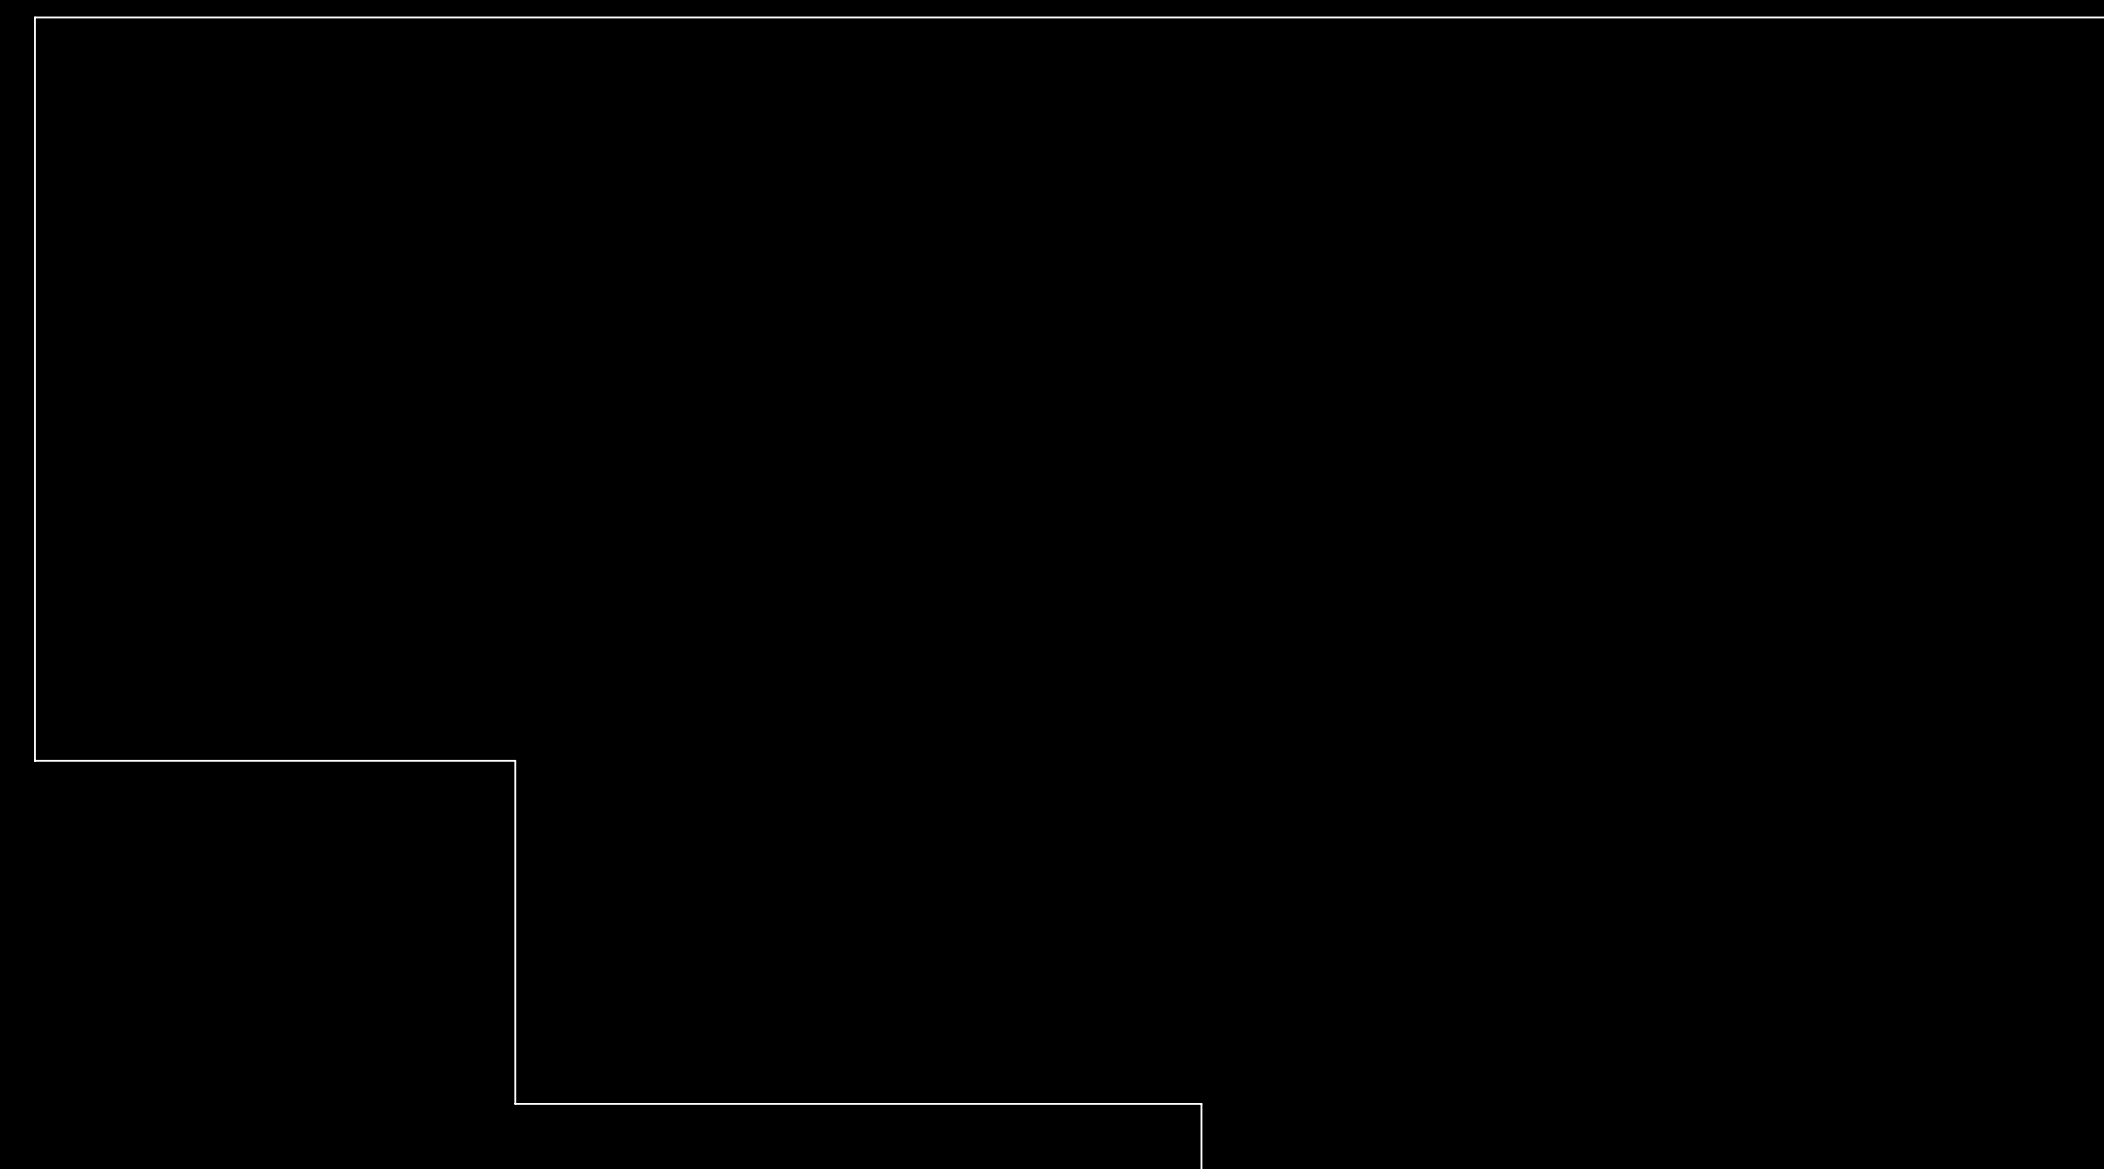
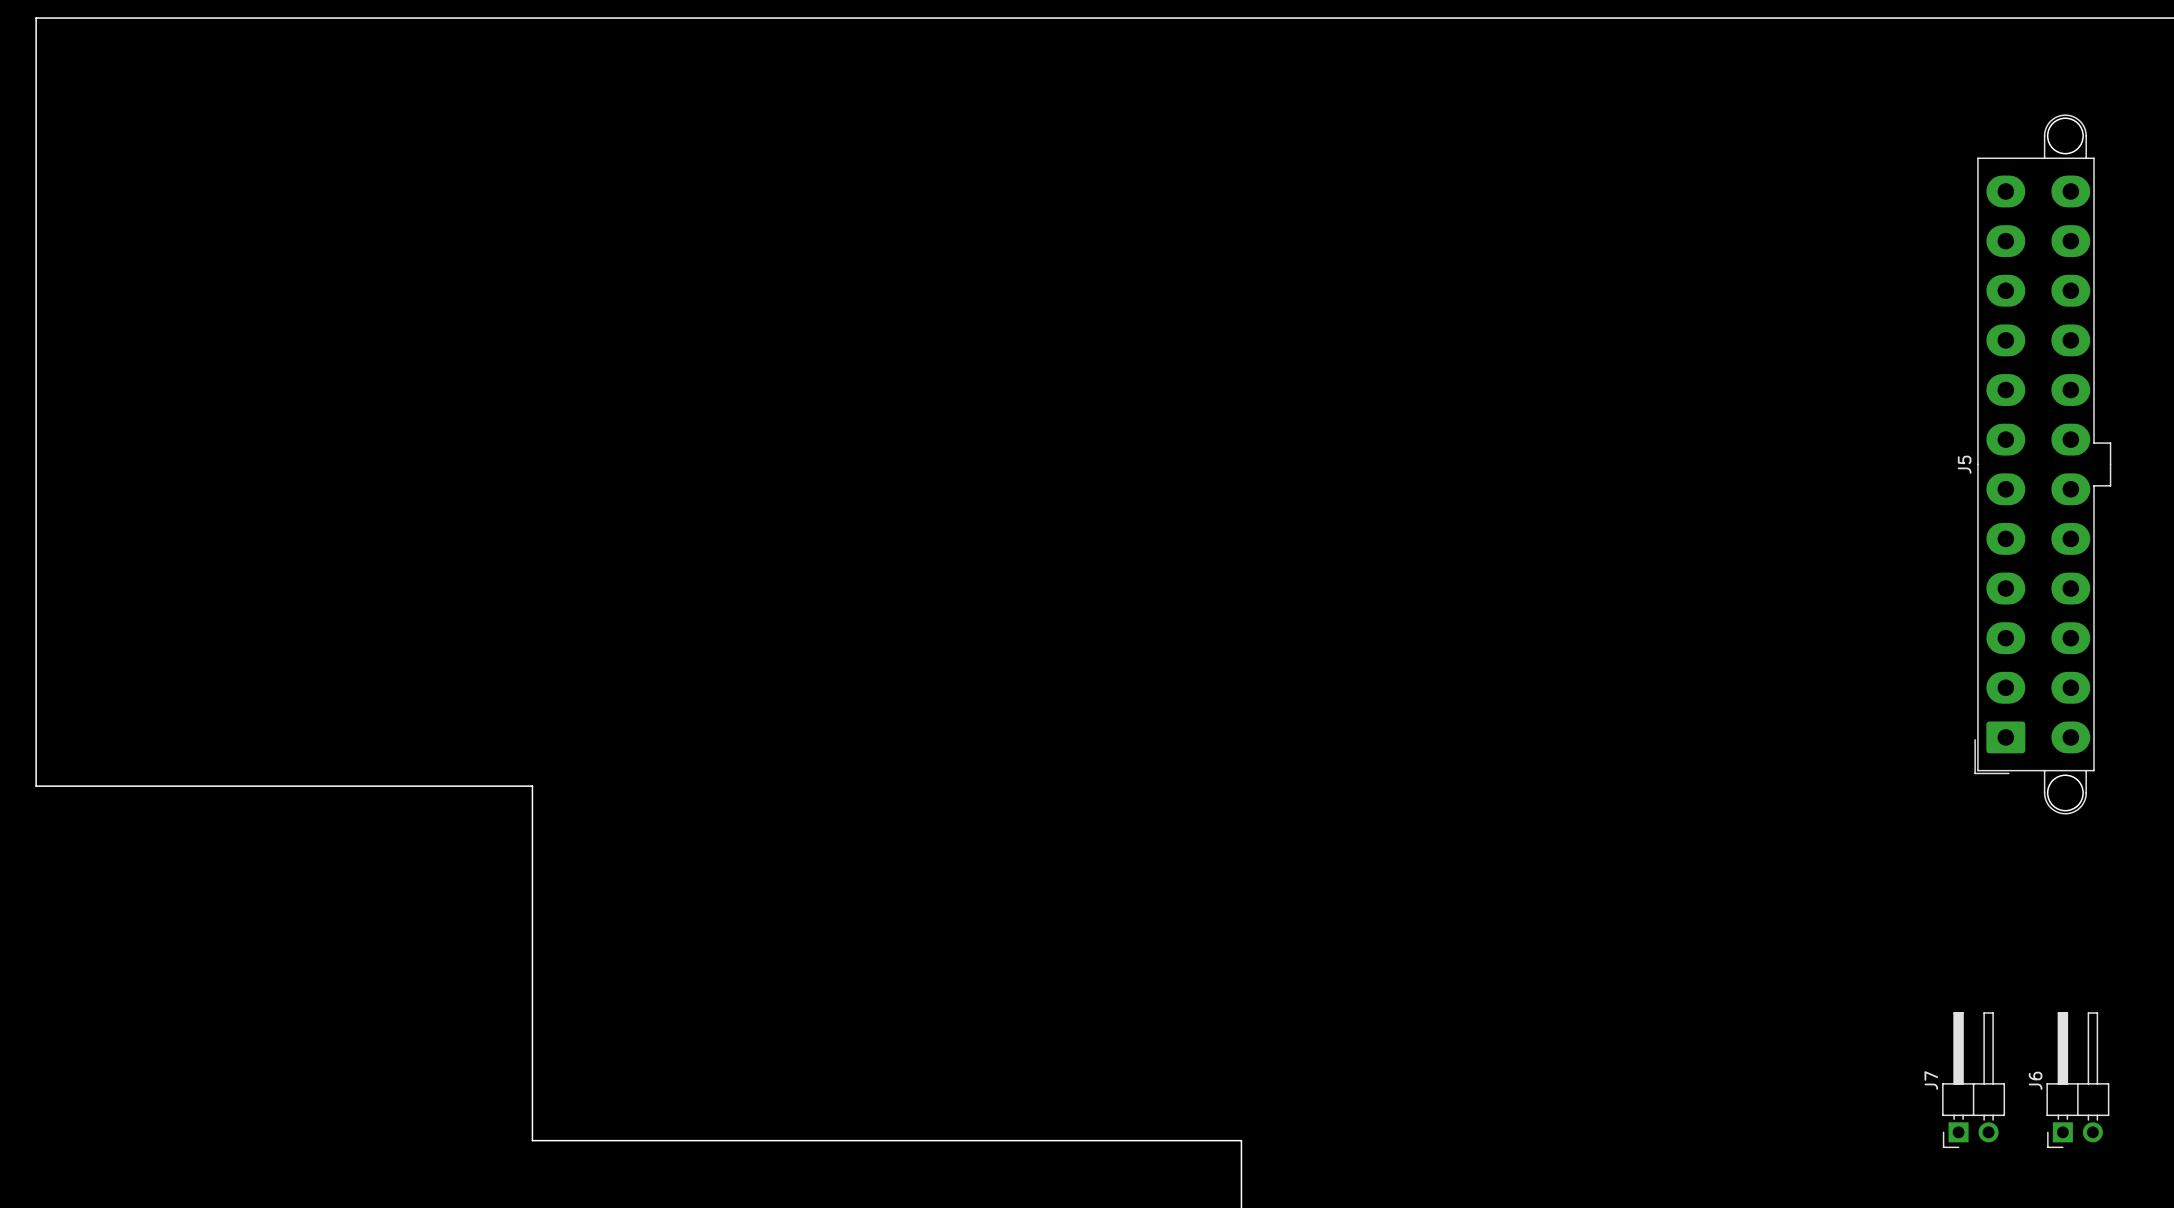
J5: none -> (2042, 464)
J7: none -> (1973, 1080)
J6: none -> (2077, 1080)

